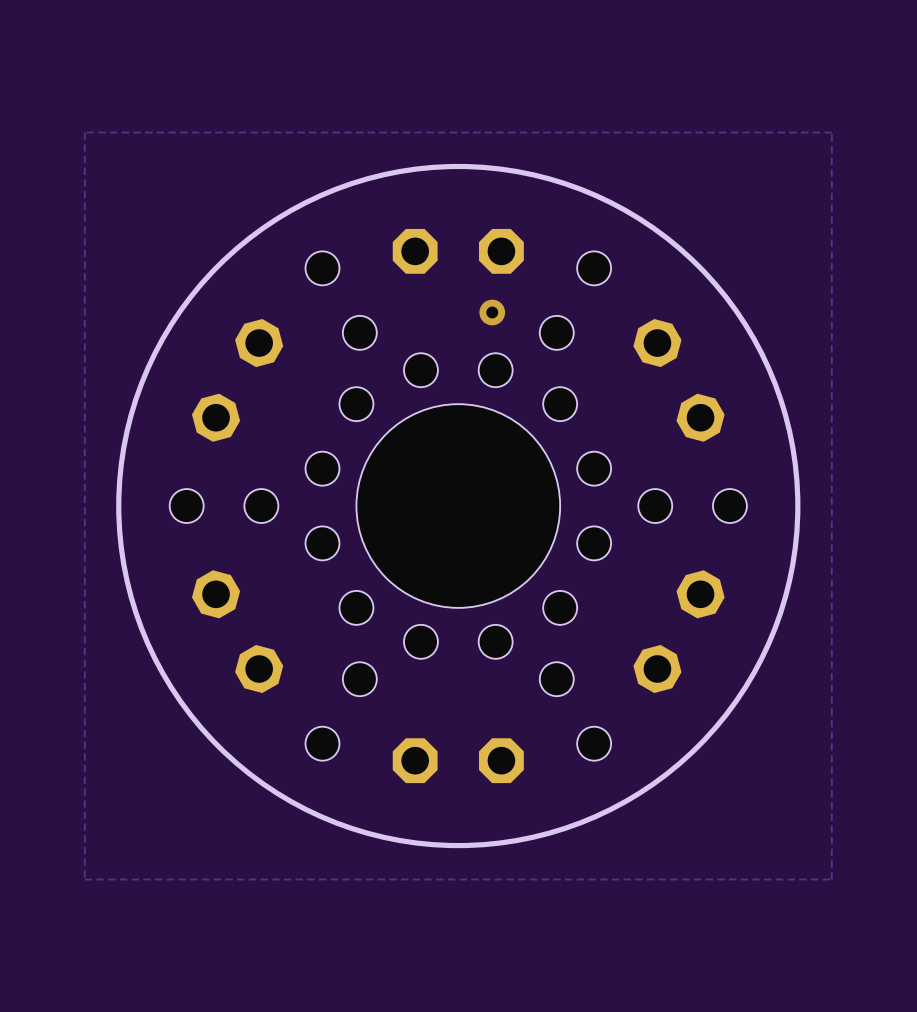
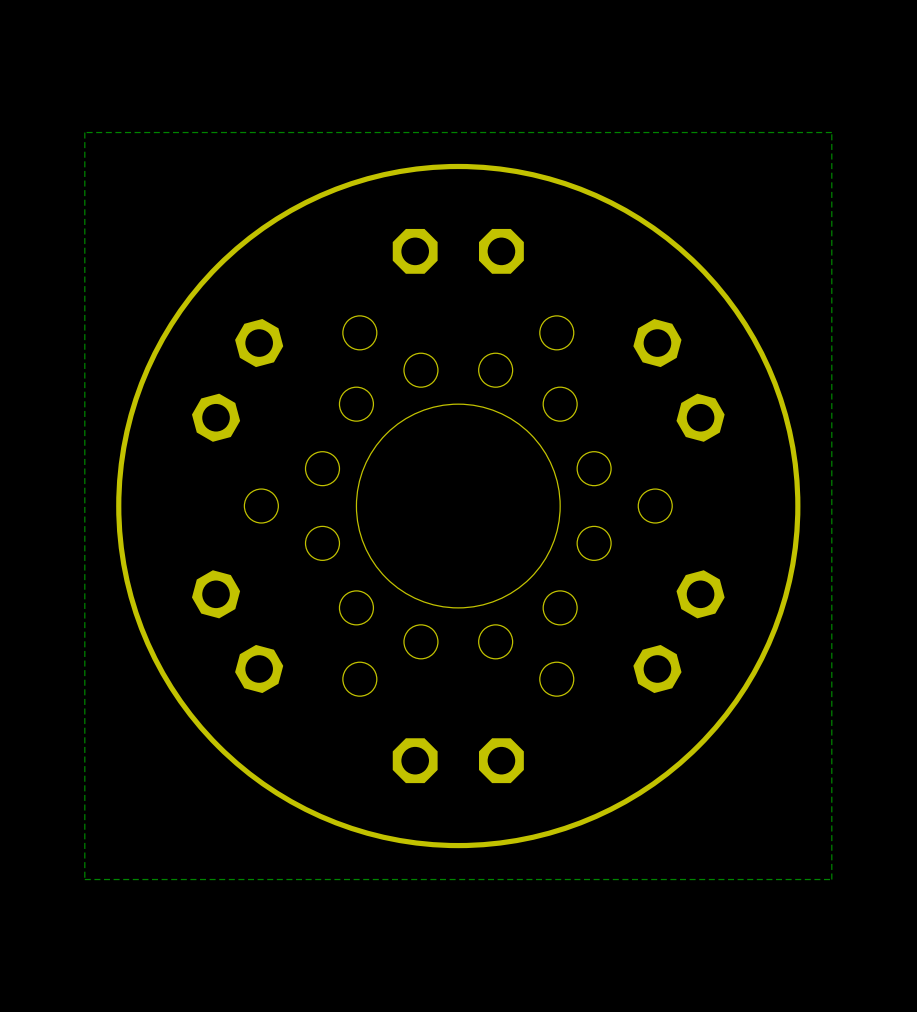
hole: (322, 268) -> none
hole: (594, 268) -> none
via: (492, 312) -> none
hole: (186, 506) -> none
hole: (729, 506) -> none
hole: (322, 743) -> none
hole: (594, 743) -> none

